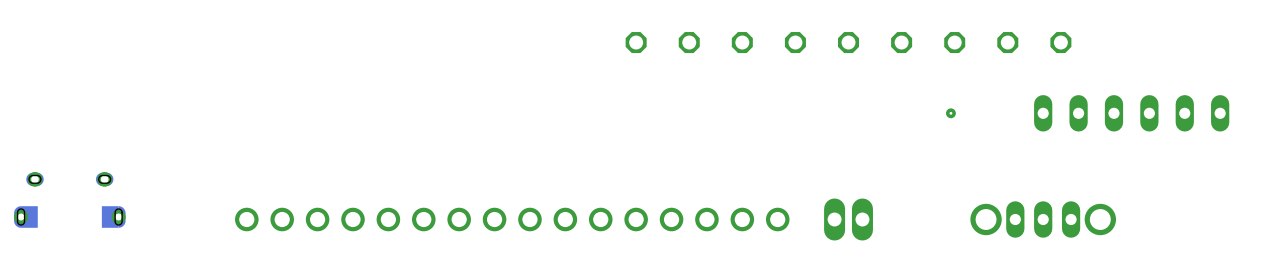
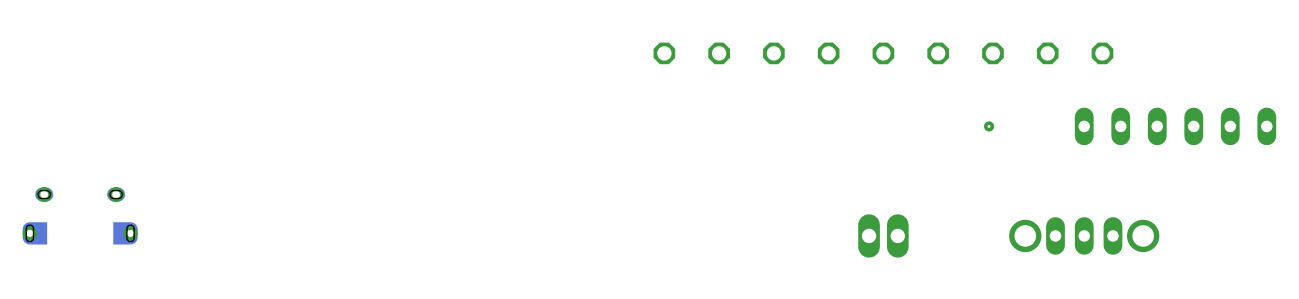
part: (264, 219) -> none
part: (335, 219) -> none
part: (406, 219) -> none
part: (476, 219) -> none
part: (547, 219) -> none
part: (618, 219) -> none
part: (689, 219) -> none
part: (760, 219) -> none

